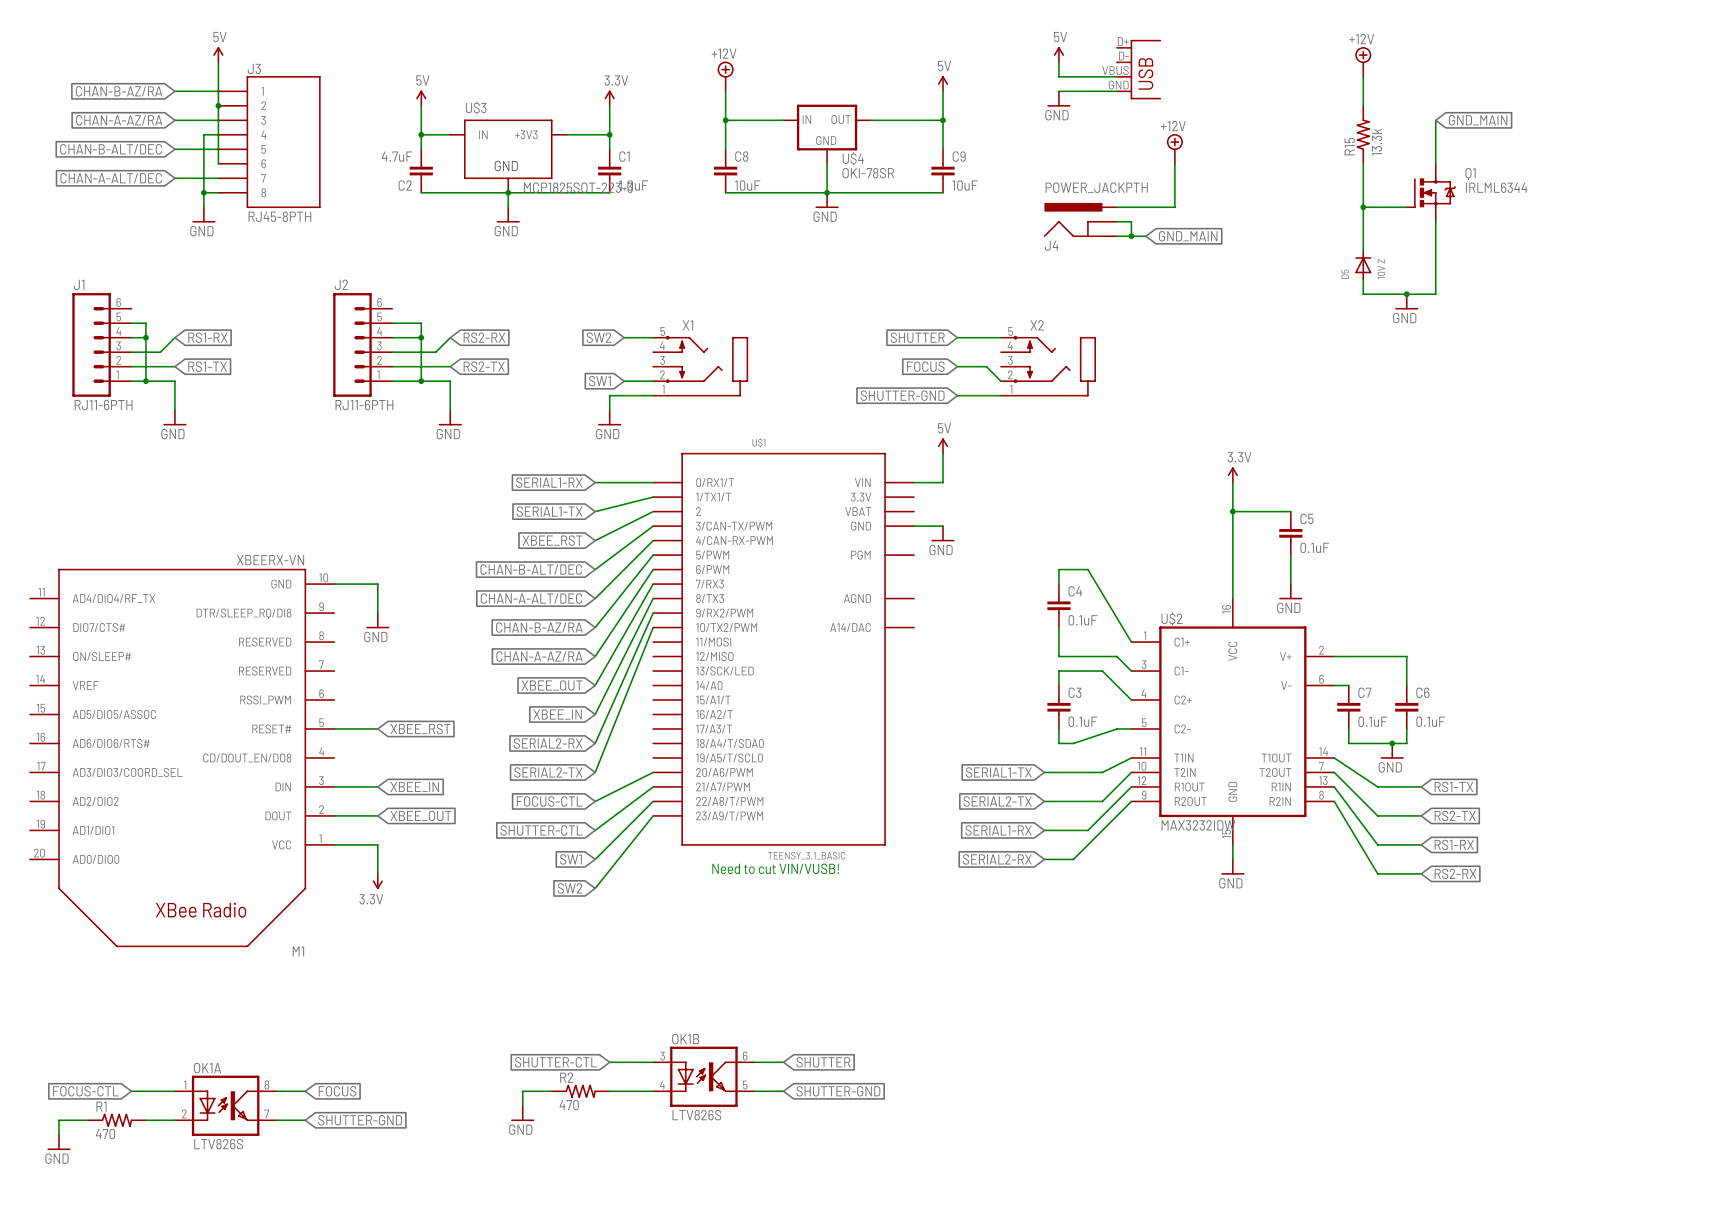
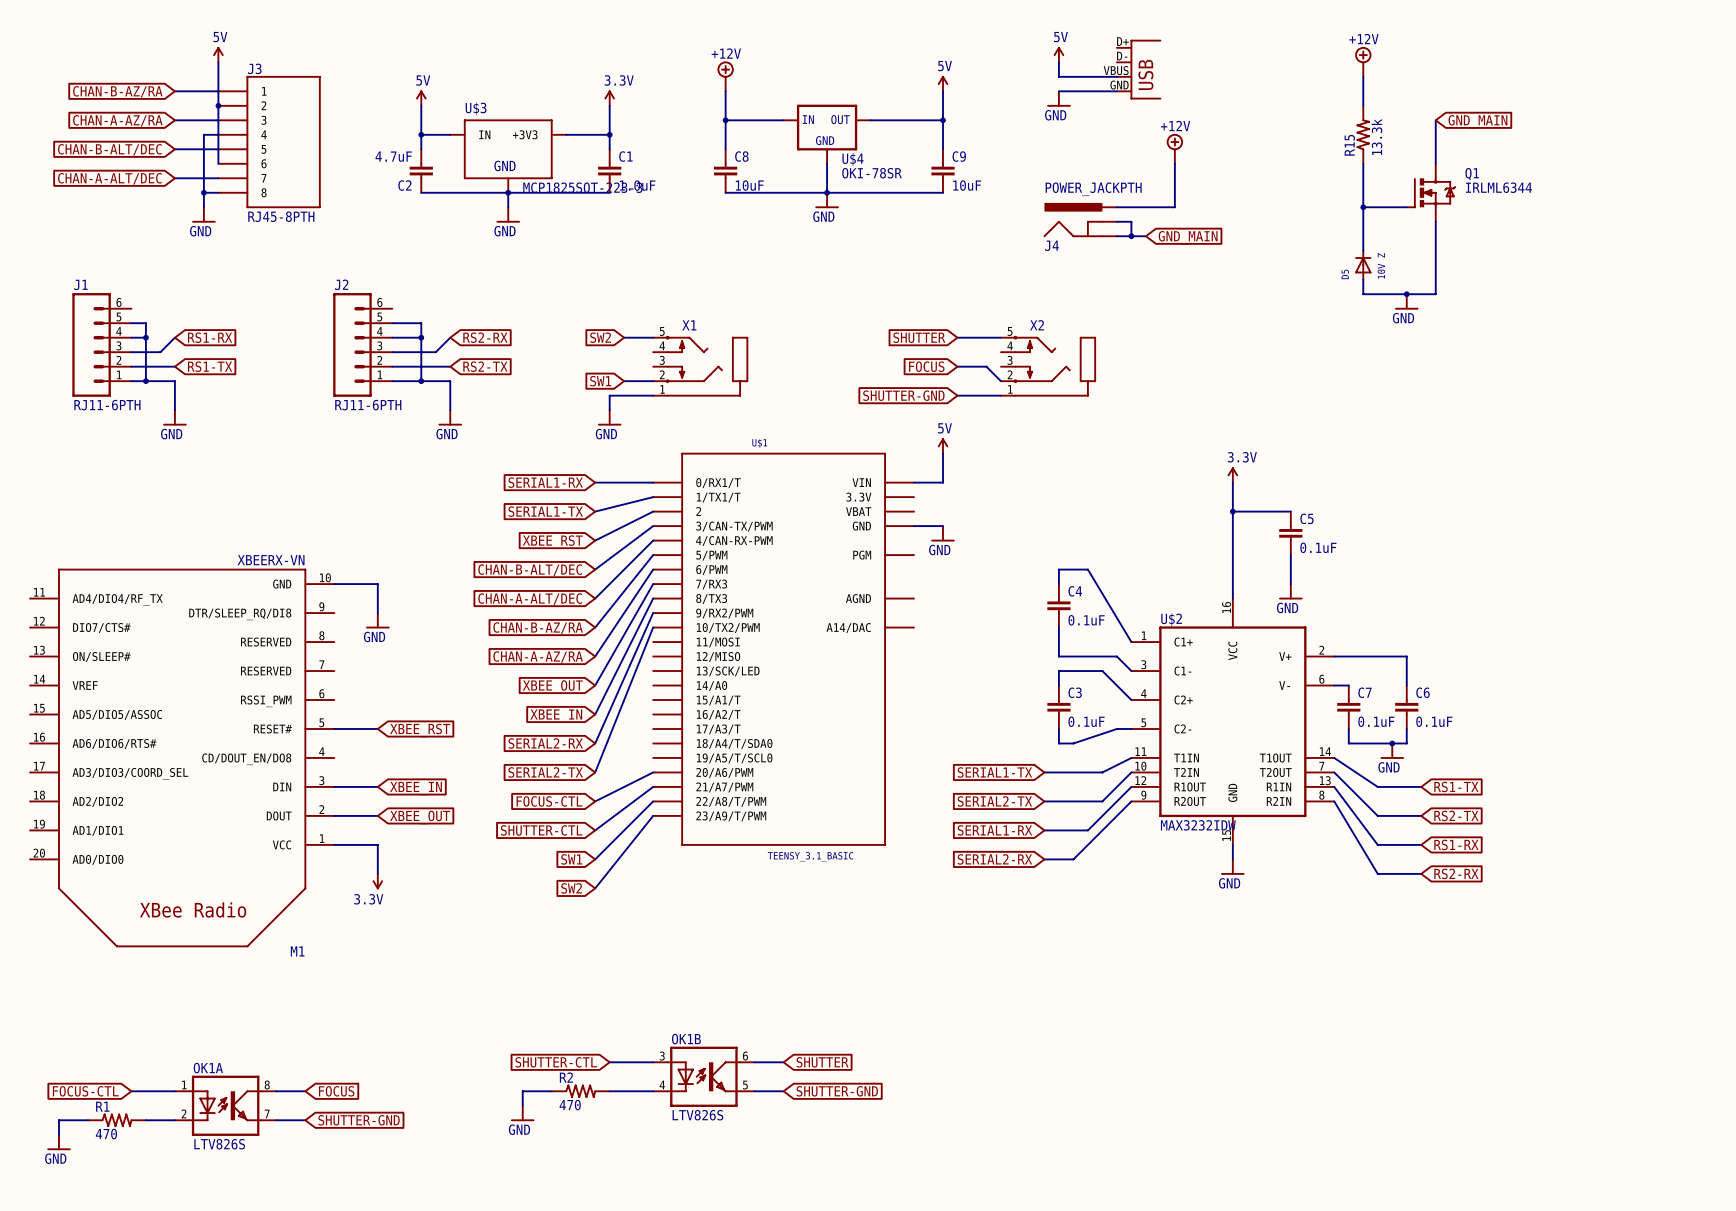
text: Need to cut VIN/VUSB! (775, 868) -> none

